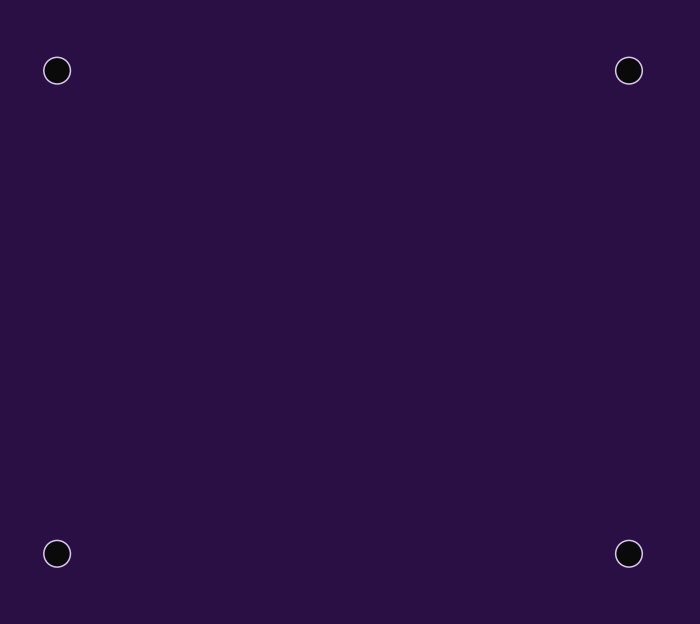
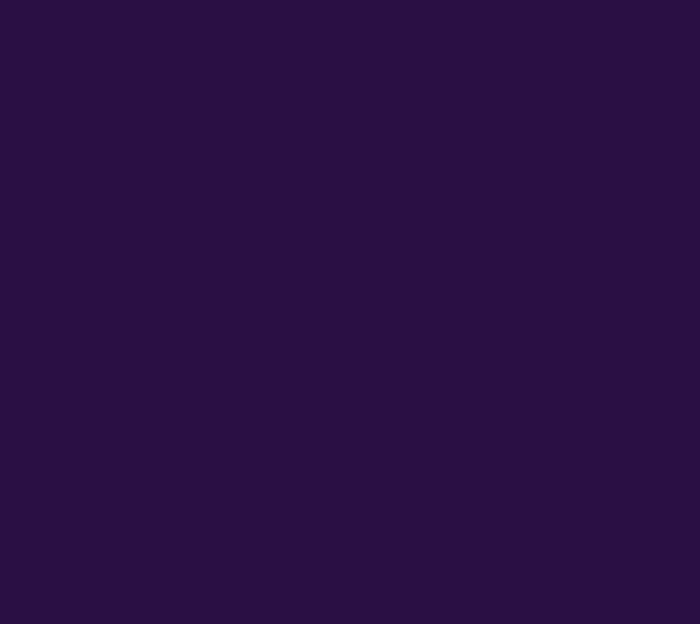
part: (57, 70) -> none
part: (628, 70) -> none
part: (57, 553) -> none
part: (628, 553) -> none

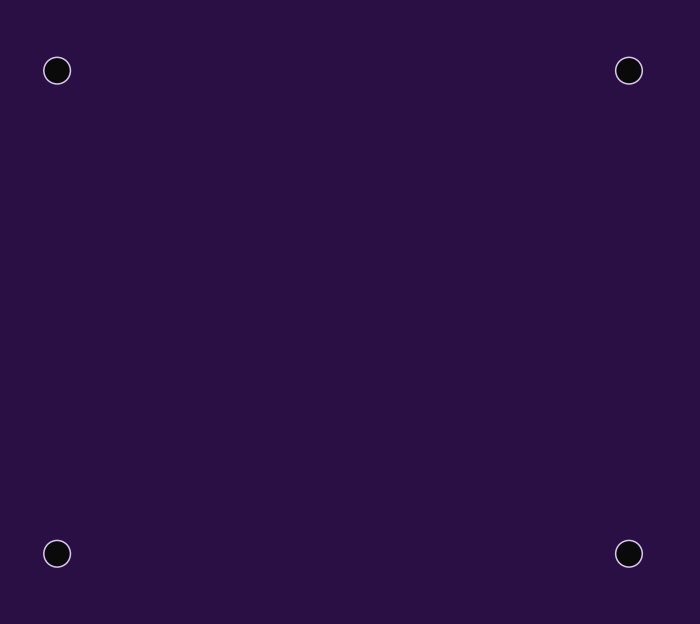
part: none -> (57, 70)
part: none -> (628, 70)
part: none -> (57, 553)
part: none -> (628, 553)

